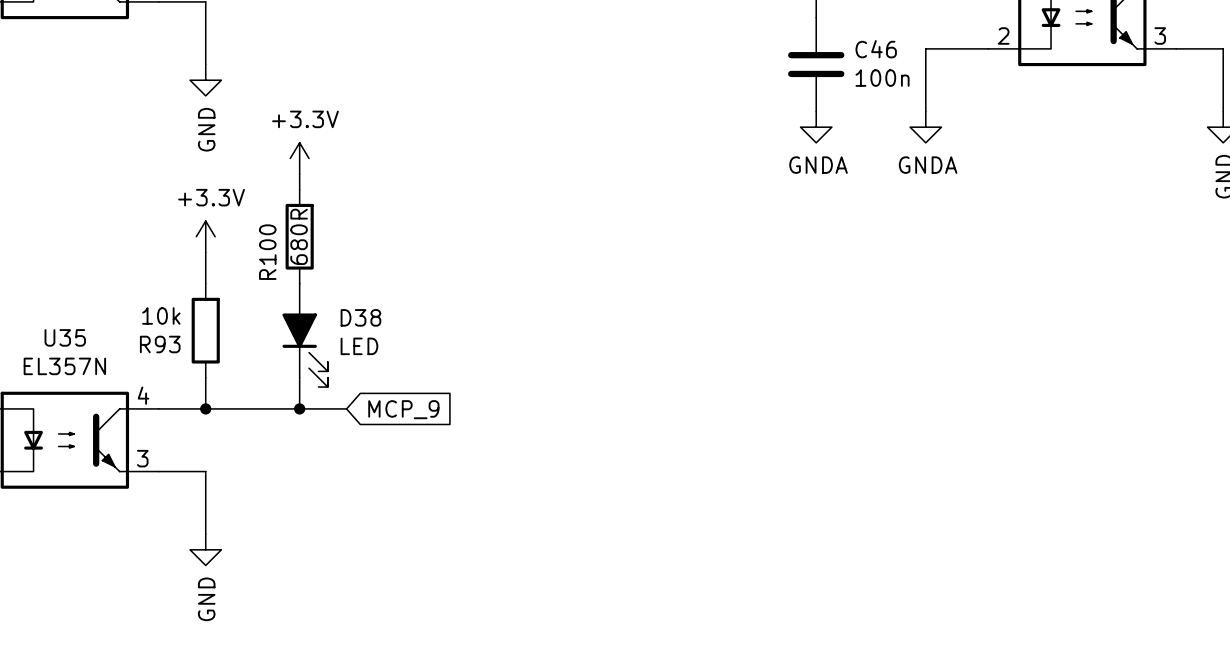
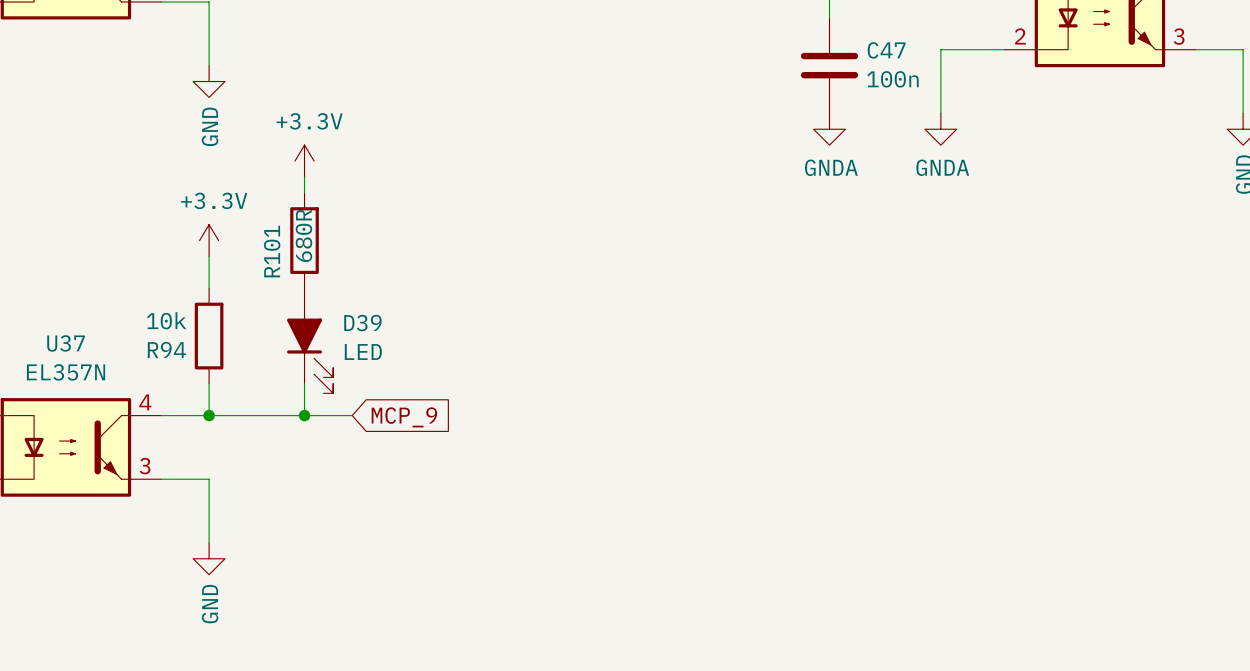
C46 name: C46 (876, 49) -> C47 (886, 50)
R100 name: R100 (267, 252) -> R101 (272, 251)
D38 name: D38 (360, 317) -> D39 (362, 323)
U35 name: U35 (65, 337) -> U37 (66, 343)
R93 name: R93 (160, 344) -> R94 (166, 349)

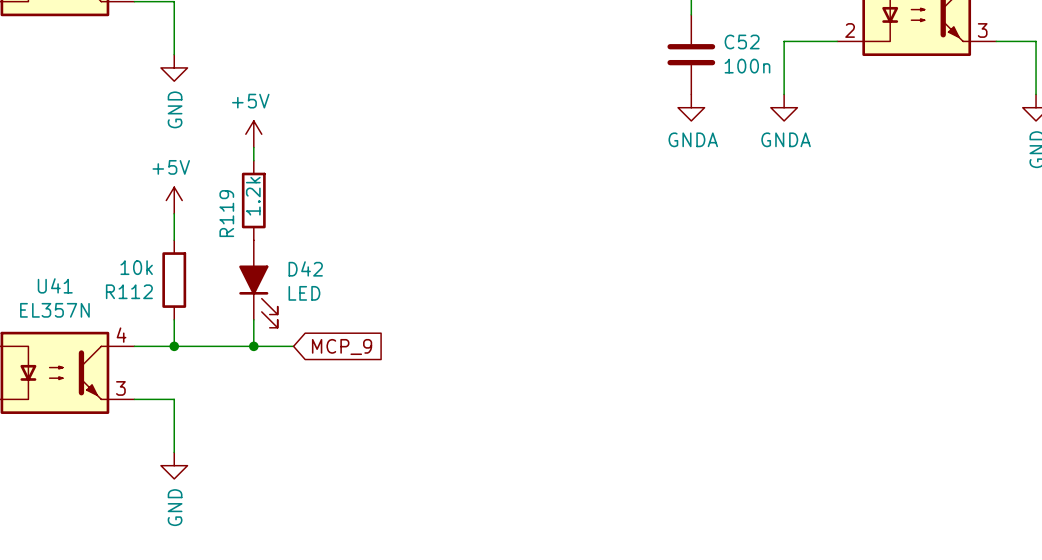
C47 name: C47 (886, 50) -> C52 (742, 41)
power symbol: +3.3V (304, 161) -> +5V (253, 134)
R101 value: 680R (303, 235) -> 1.2k (253, 196)
power symbol: +3.3V (209, 240) -> +5V (174, 200)
R101 name: R101 (272, 251) -> R119 (226, 213)
D39 name: D39 (362, 323) -> D42 (305, 268)
U37 name: U37 (66, 343) -> U41 (55, 285)
R94 name: R94 (166, 349) -> R112 (129, 291)

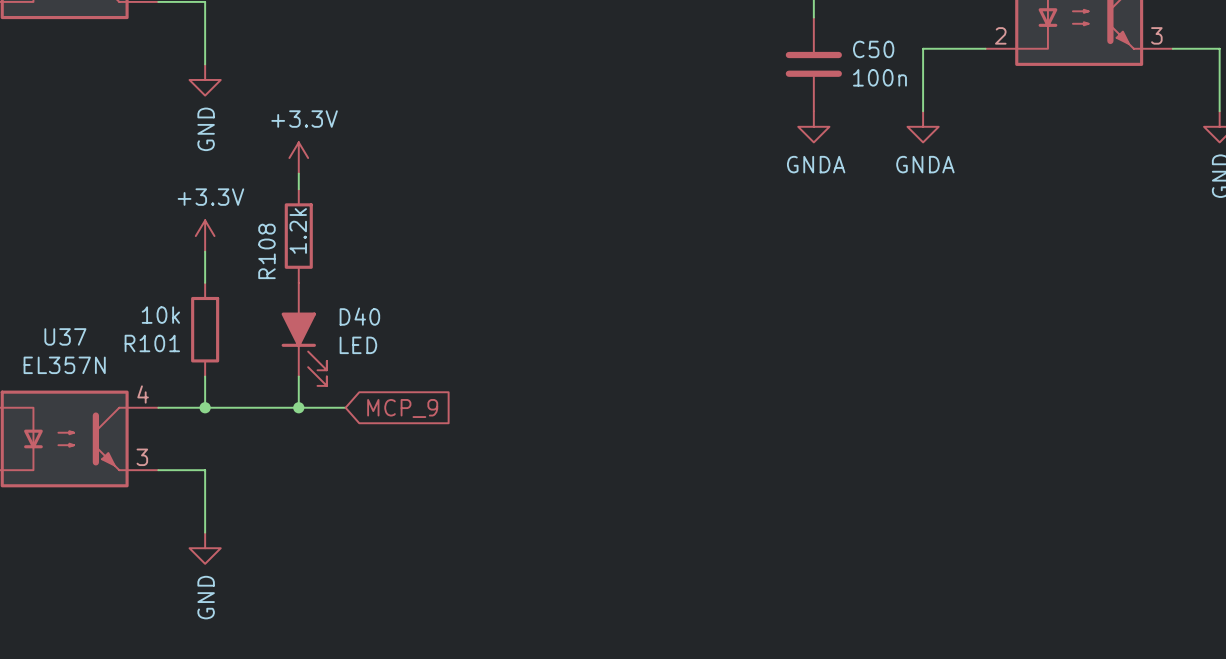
C52 name: C52 (742, 41) -> C50 (873, 49)
power symbol: +5V (253, 134) -> +3.3V (298, 158)
power symbol: +5V (174, 200) -> +3.3V (205, 236)
R119 name: R119 (226, 213) -> R108 (266, 251)
D42 name: D42 (305, 268) -> D40 (359, 316)
U41 name: U41 (55, 285) -> U37 (65, 336)
R112 name: R112 (129, 291) -> R101 (152, 343)

